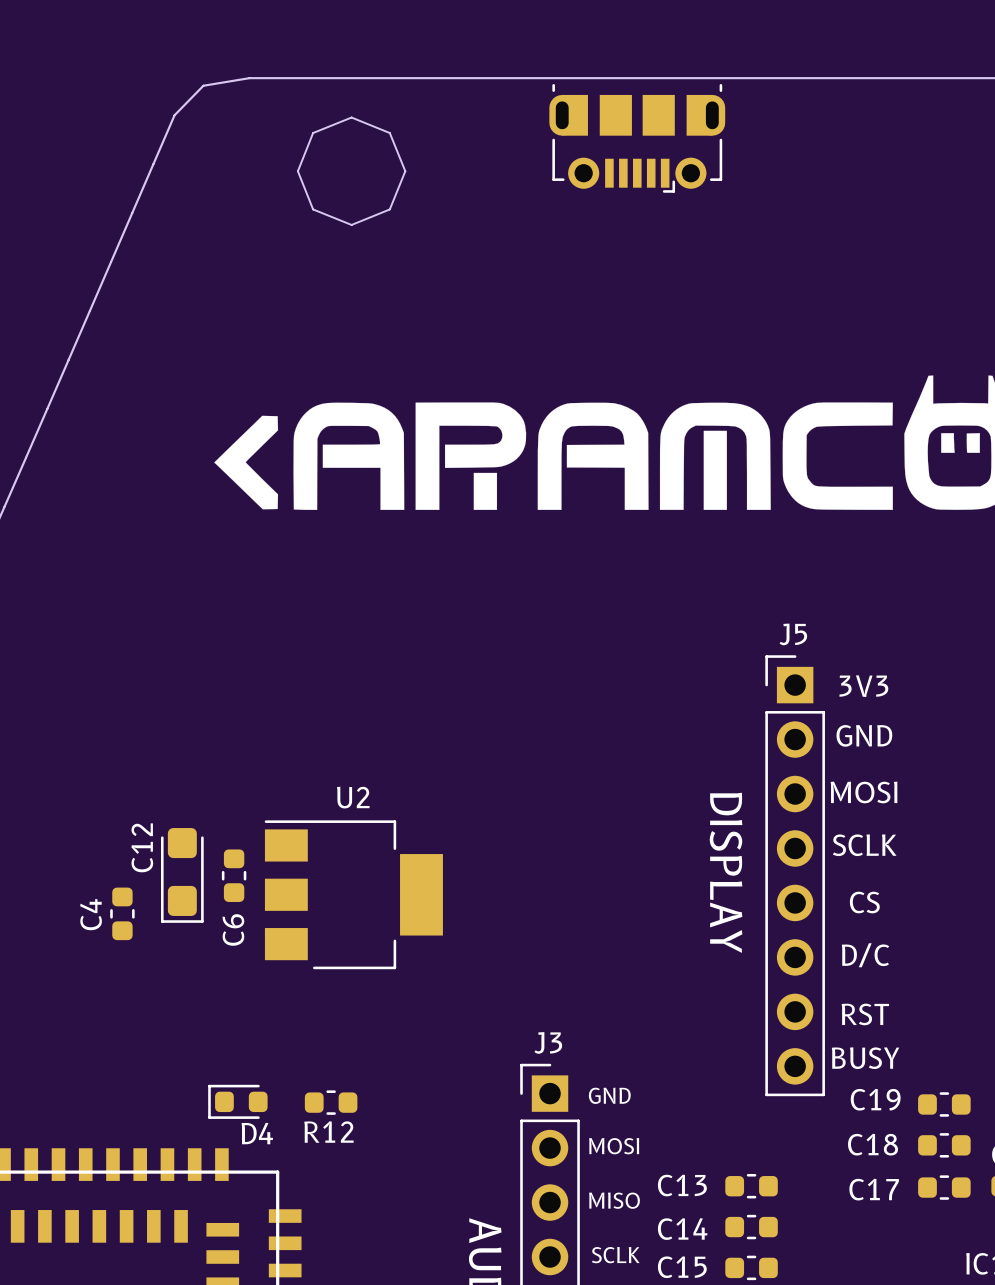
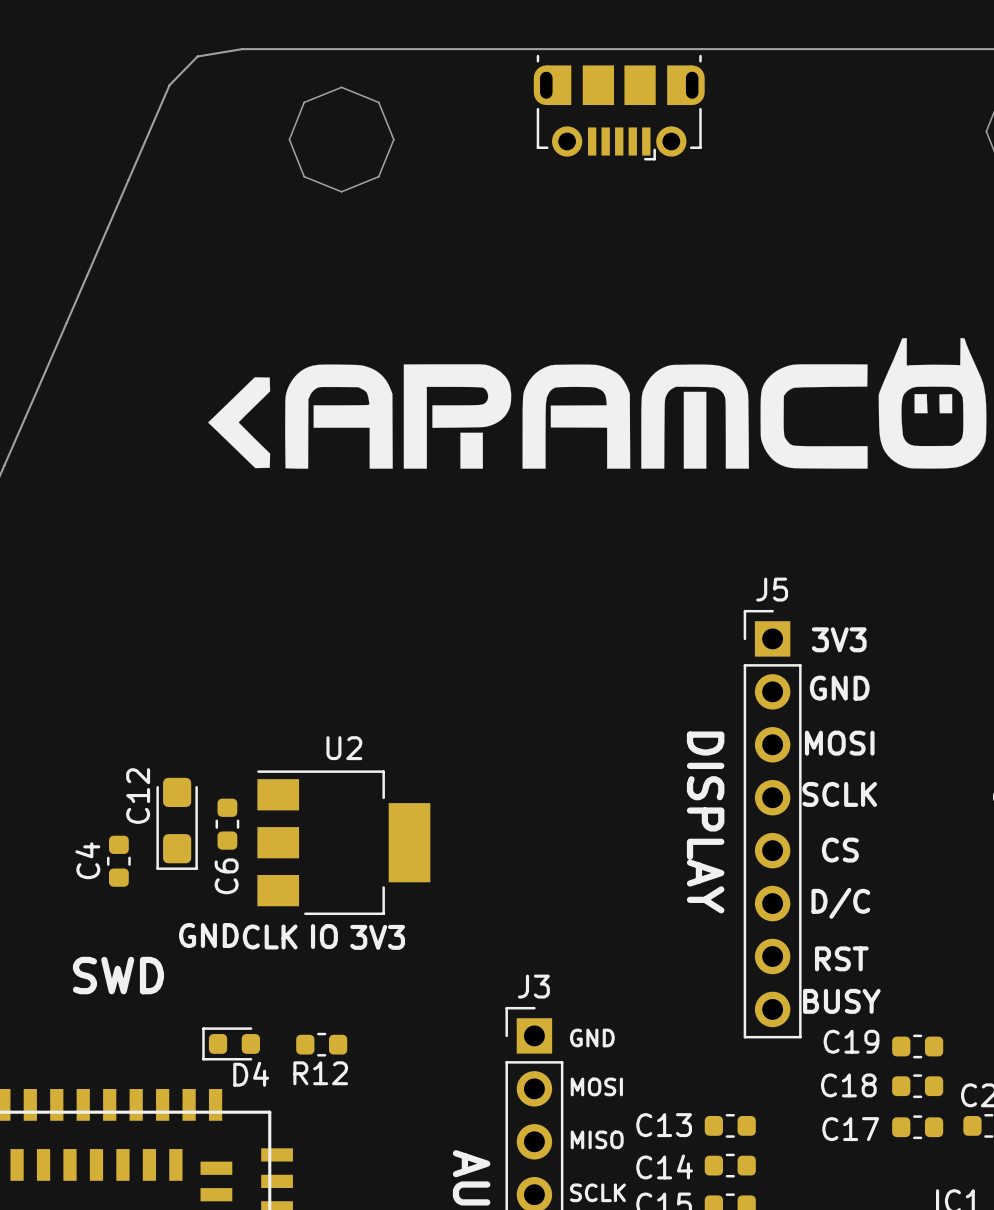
text: none -> GND (208, 935)
text: none -> CLK (270, 936)
text: none -> IO (324, 936)
text: none -> 3V3 (377, 937)
text: none -> SWD (118, 975)

